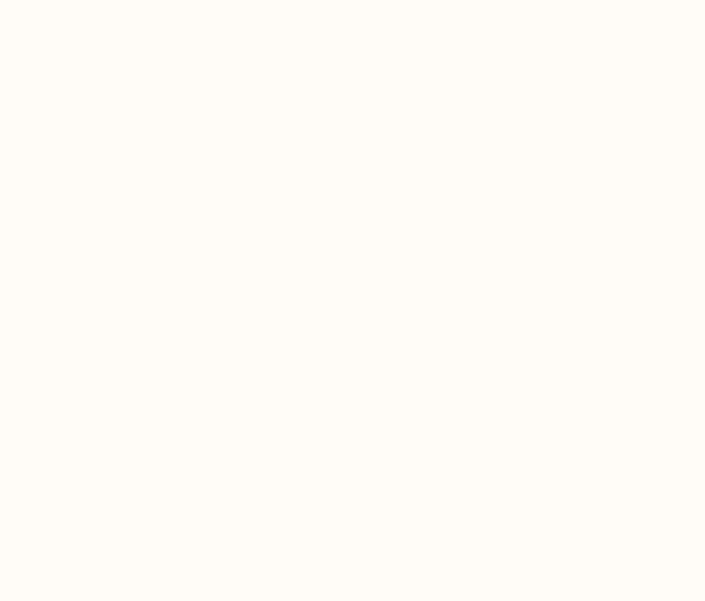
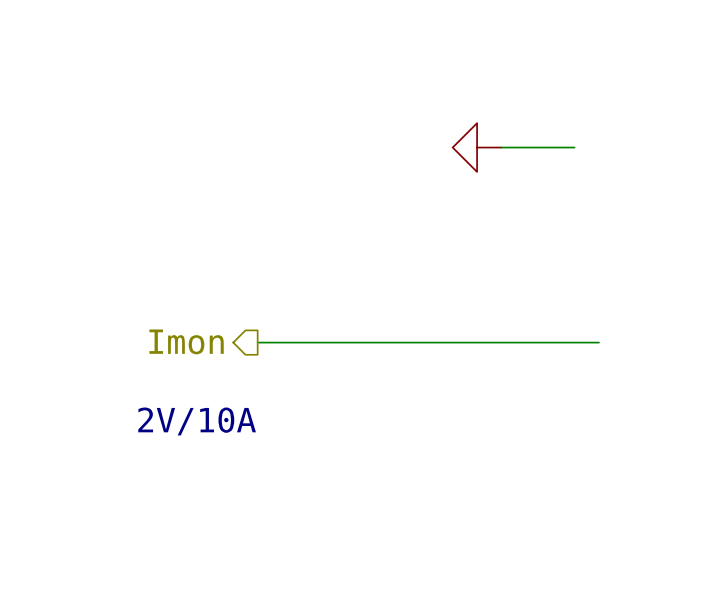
power symbol: none -> (477, 147)
wire: none -> (501, 147) (574, 147)
hierarchical label: none -> Imon (186, 341)
wire: none -> (257, 342) (598, 342)
text: none -> 2V/10A (197, 421)

